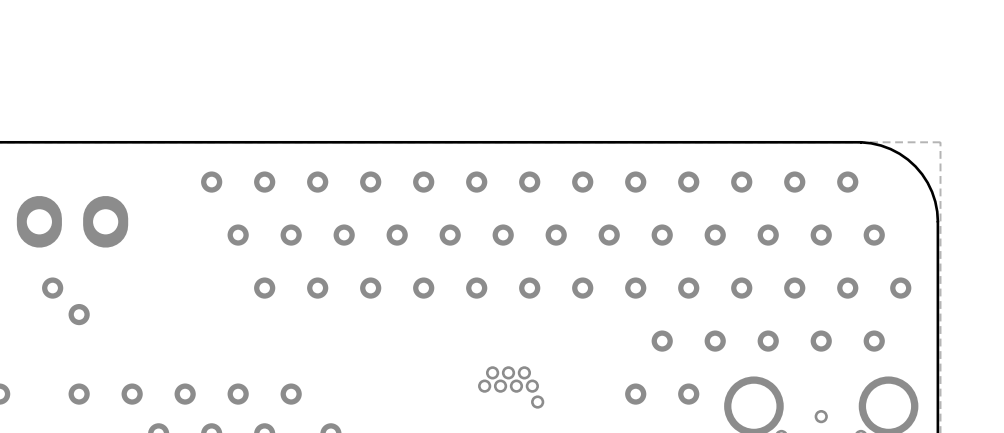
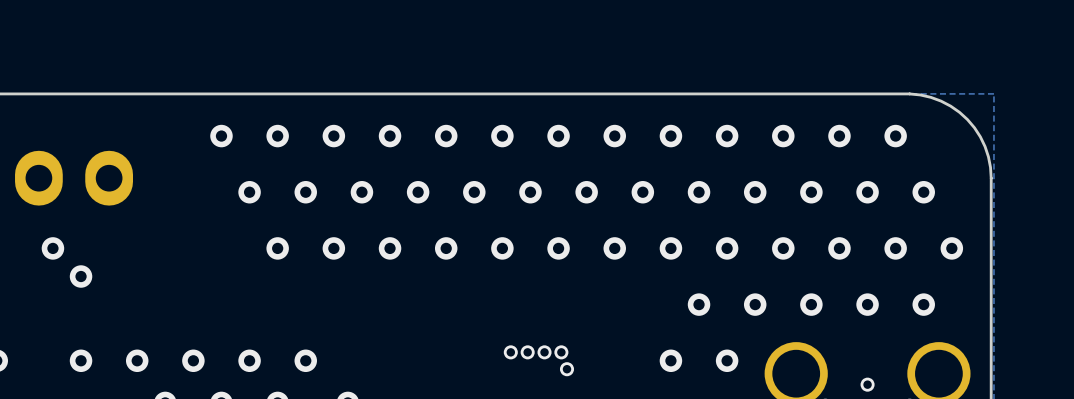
via: (492, 372) -> none
via: (508, 372) -> none
via: (524, 372) -> none

